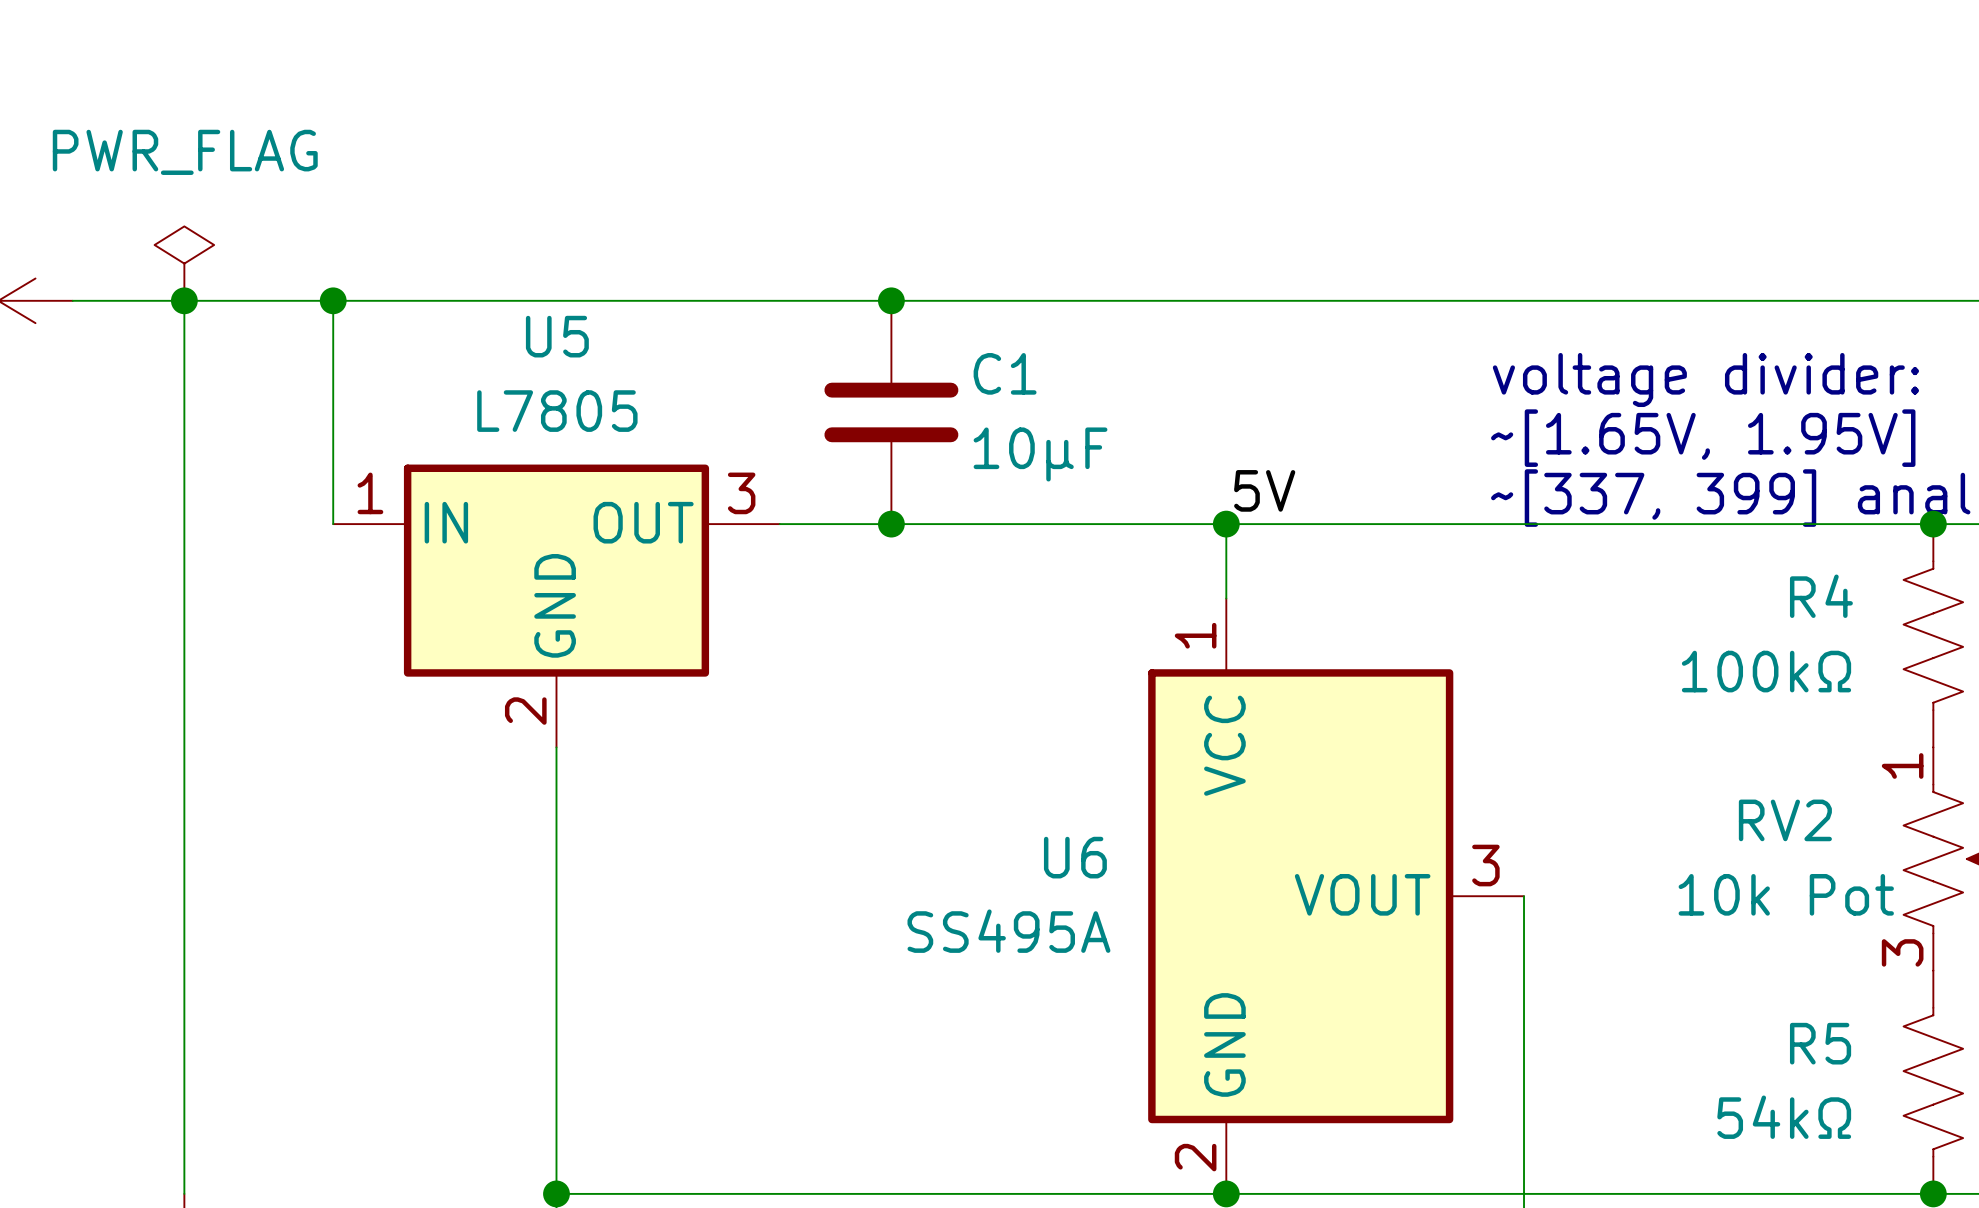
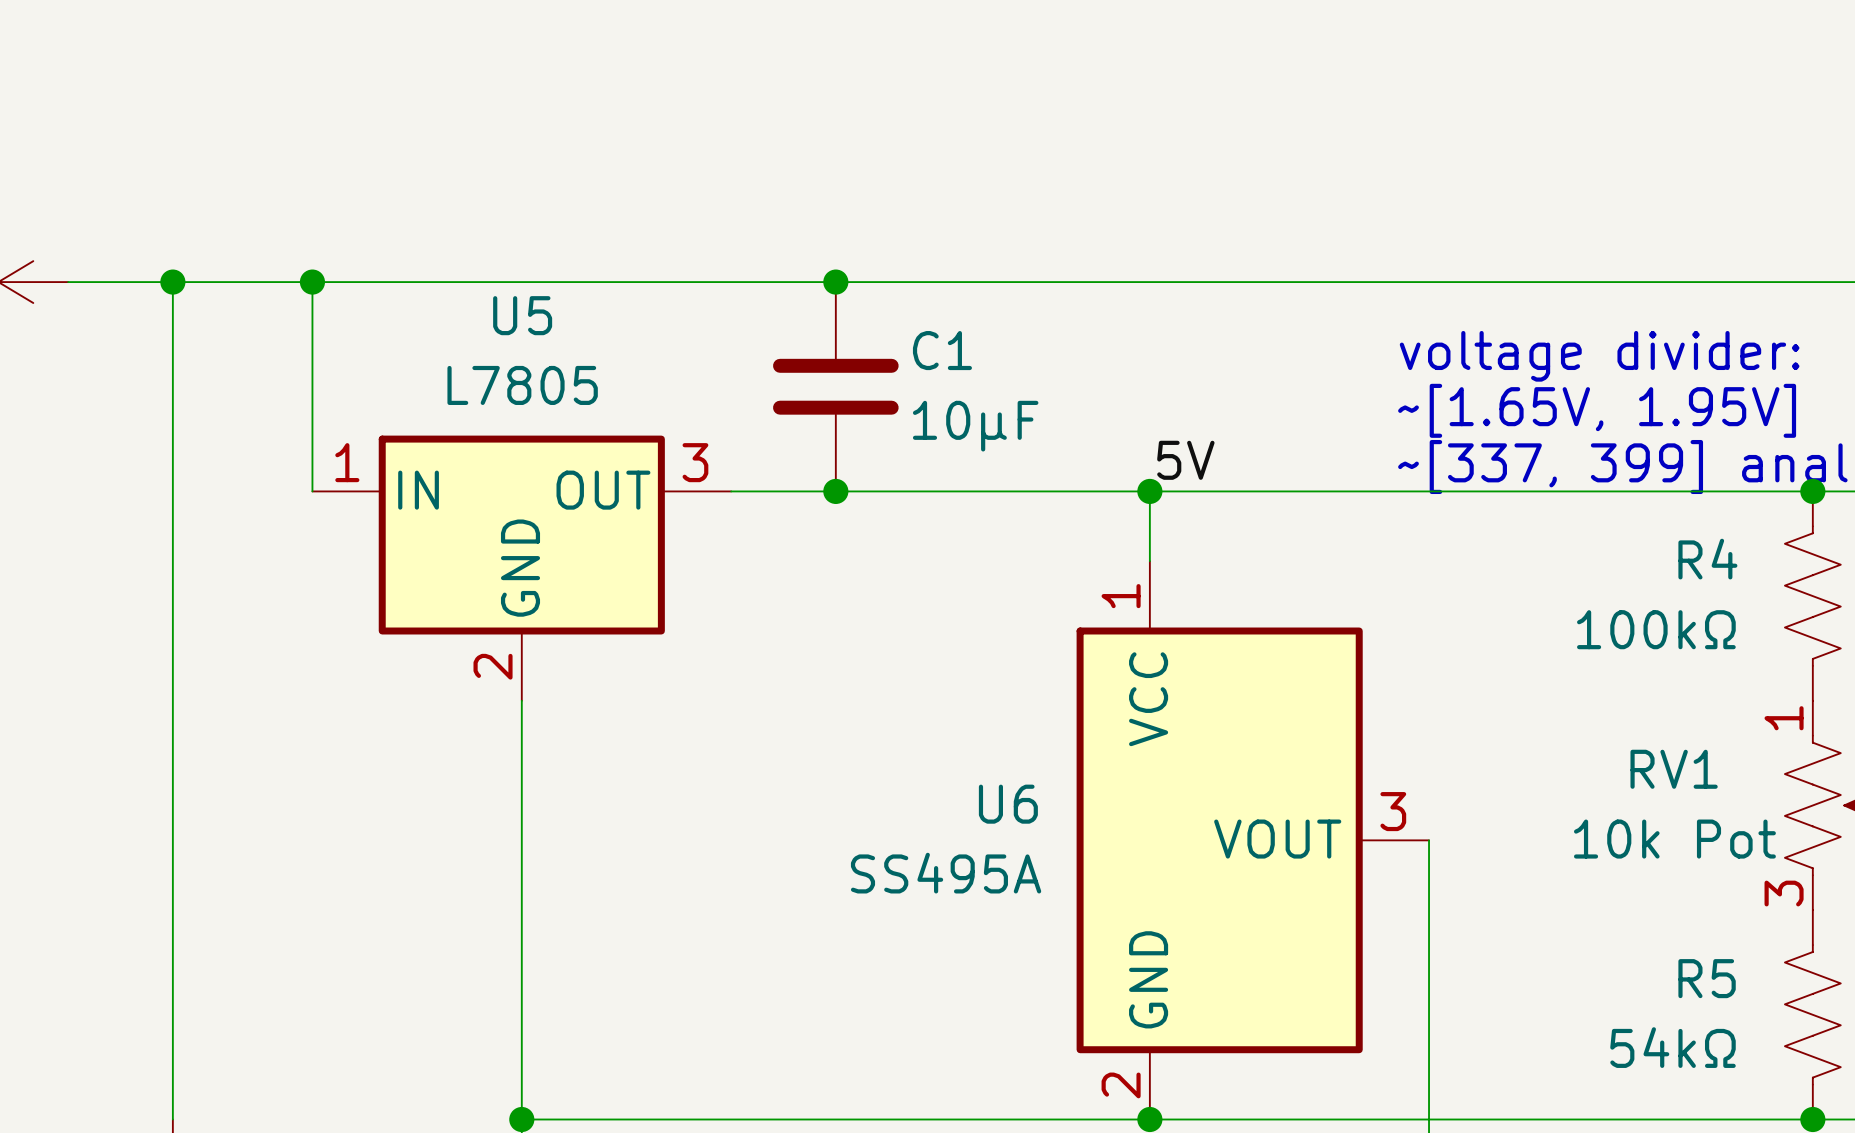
power symbol: PWR_FLAG (184, 263) -> none
RV2 name: RV2 (1785, 820) -> RV1 (1674, 769)

